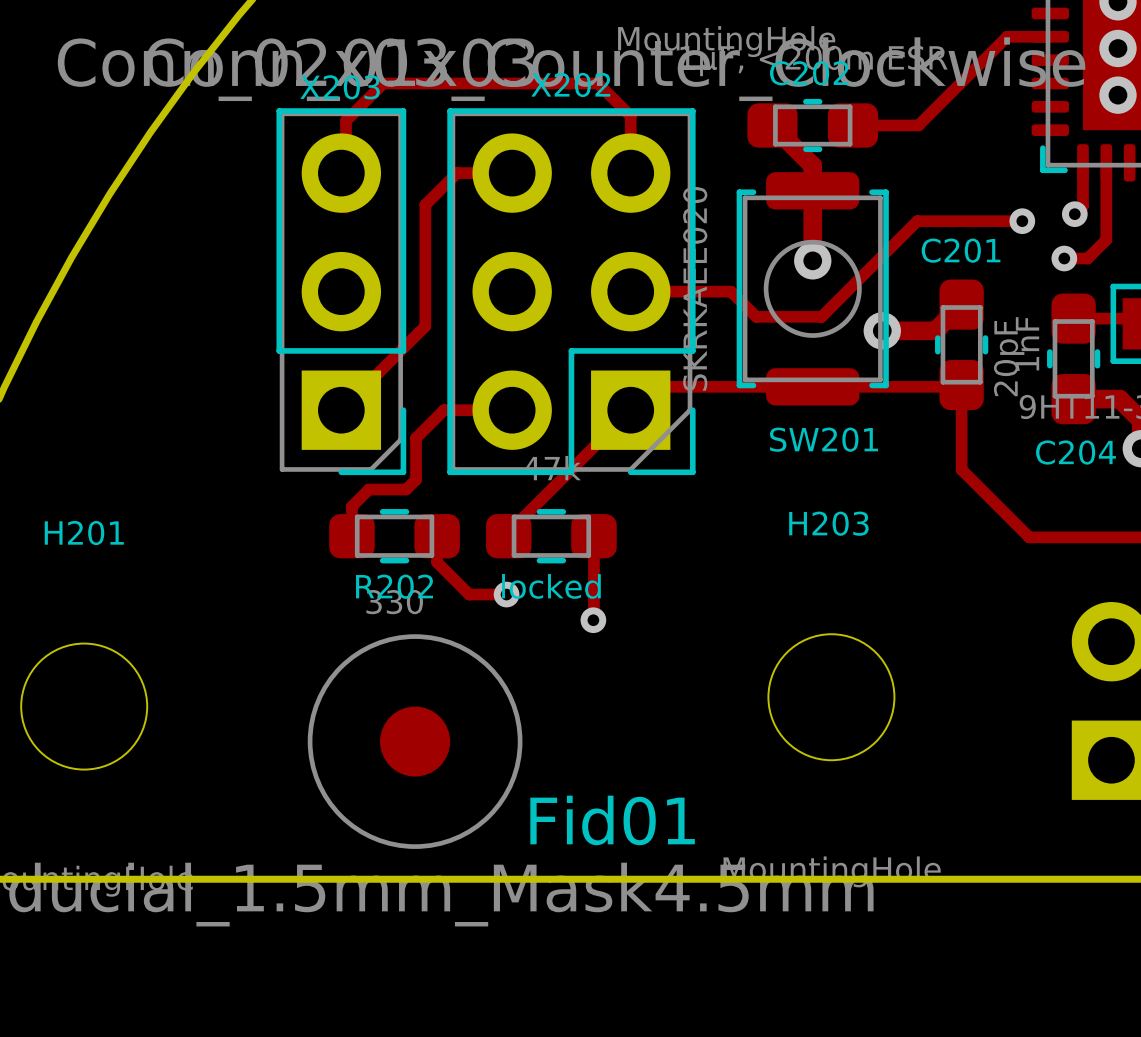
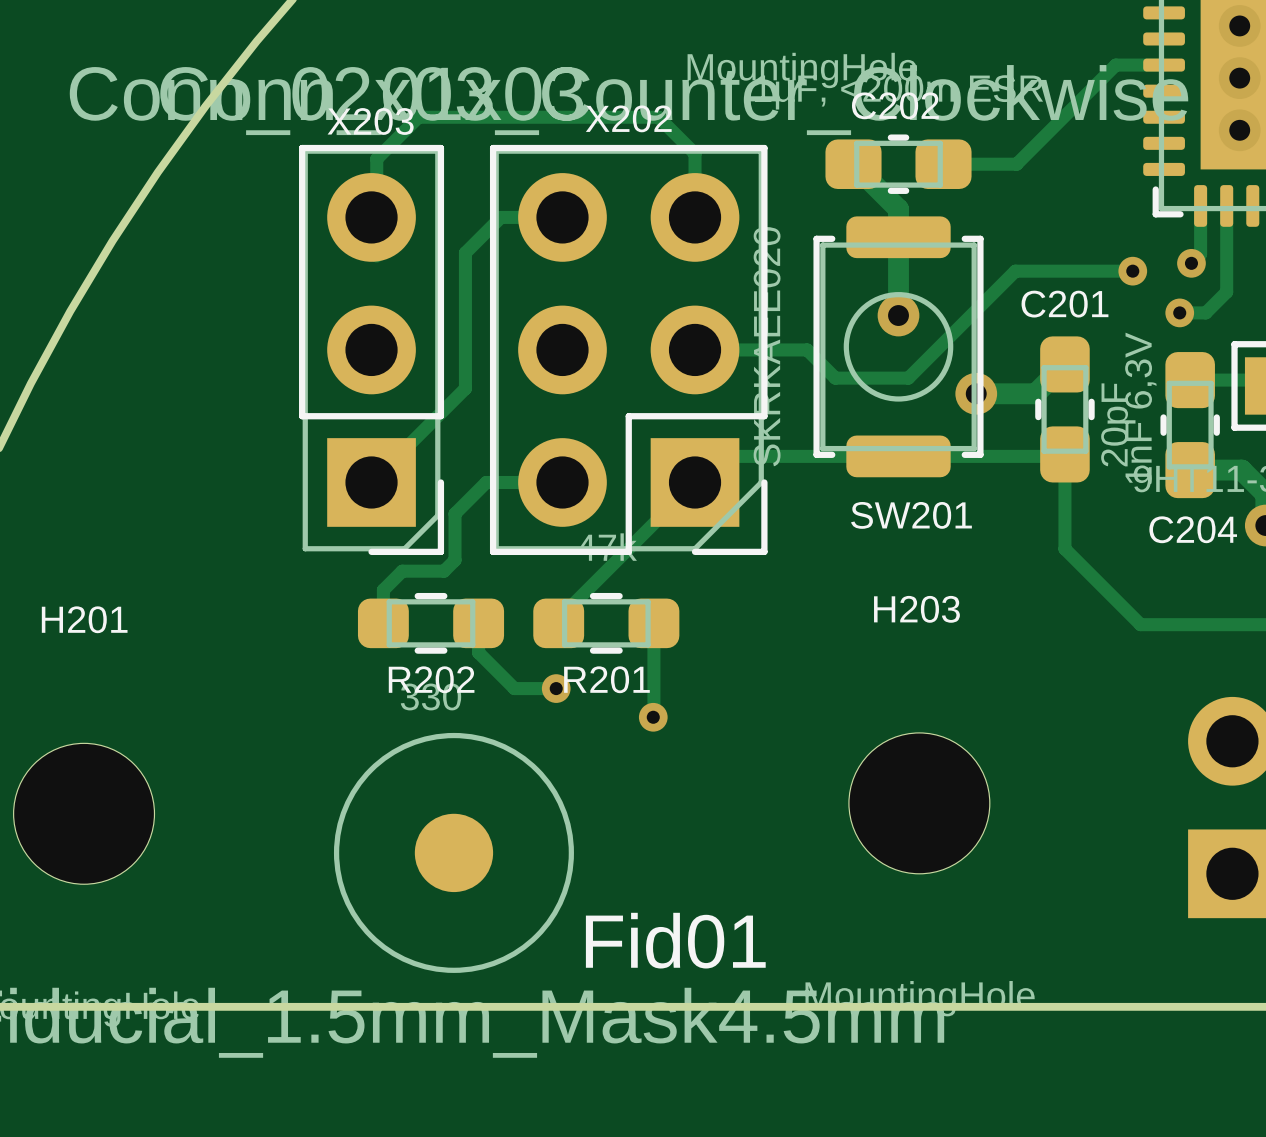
C201 value: 1nF (1027, 344) -> 1nF 6,3V (1140, 408)
locked name: locked (551, 586) -> R201 (606, 679)

